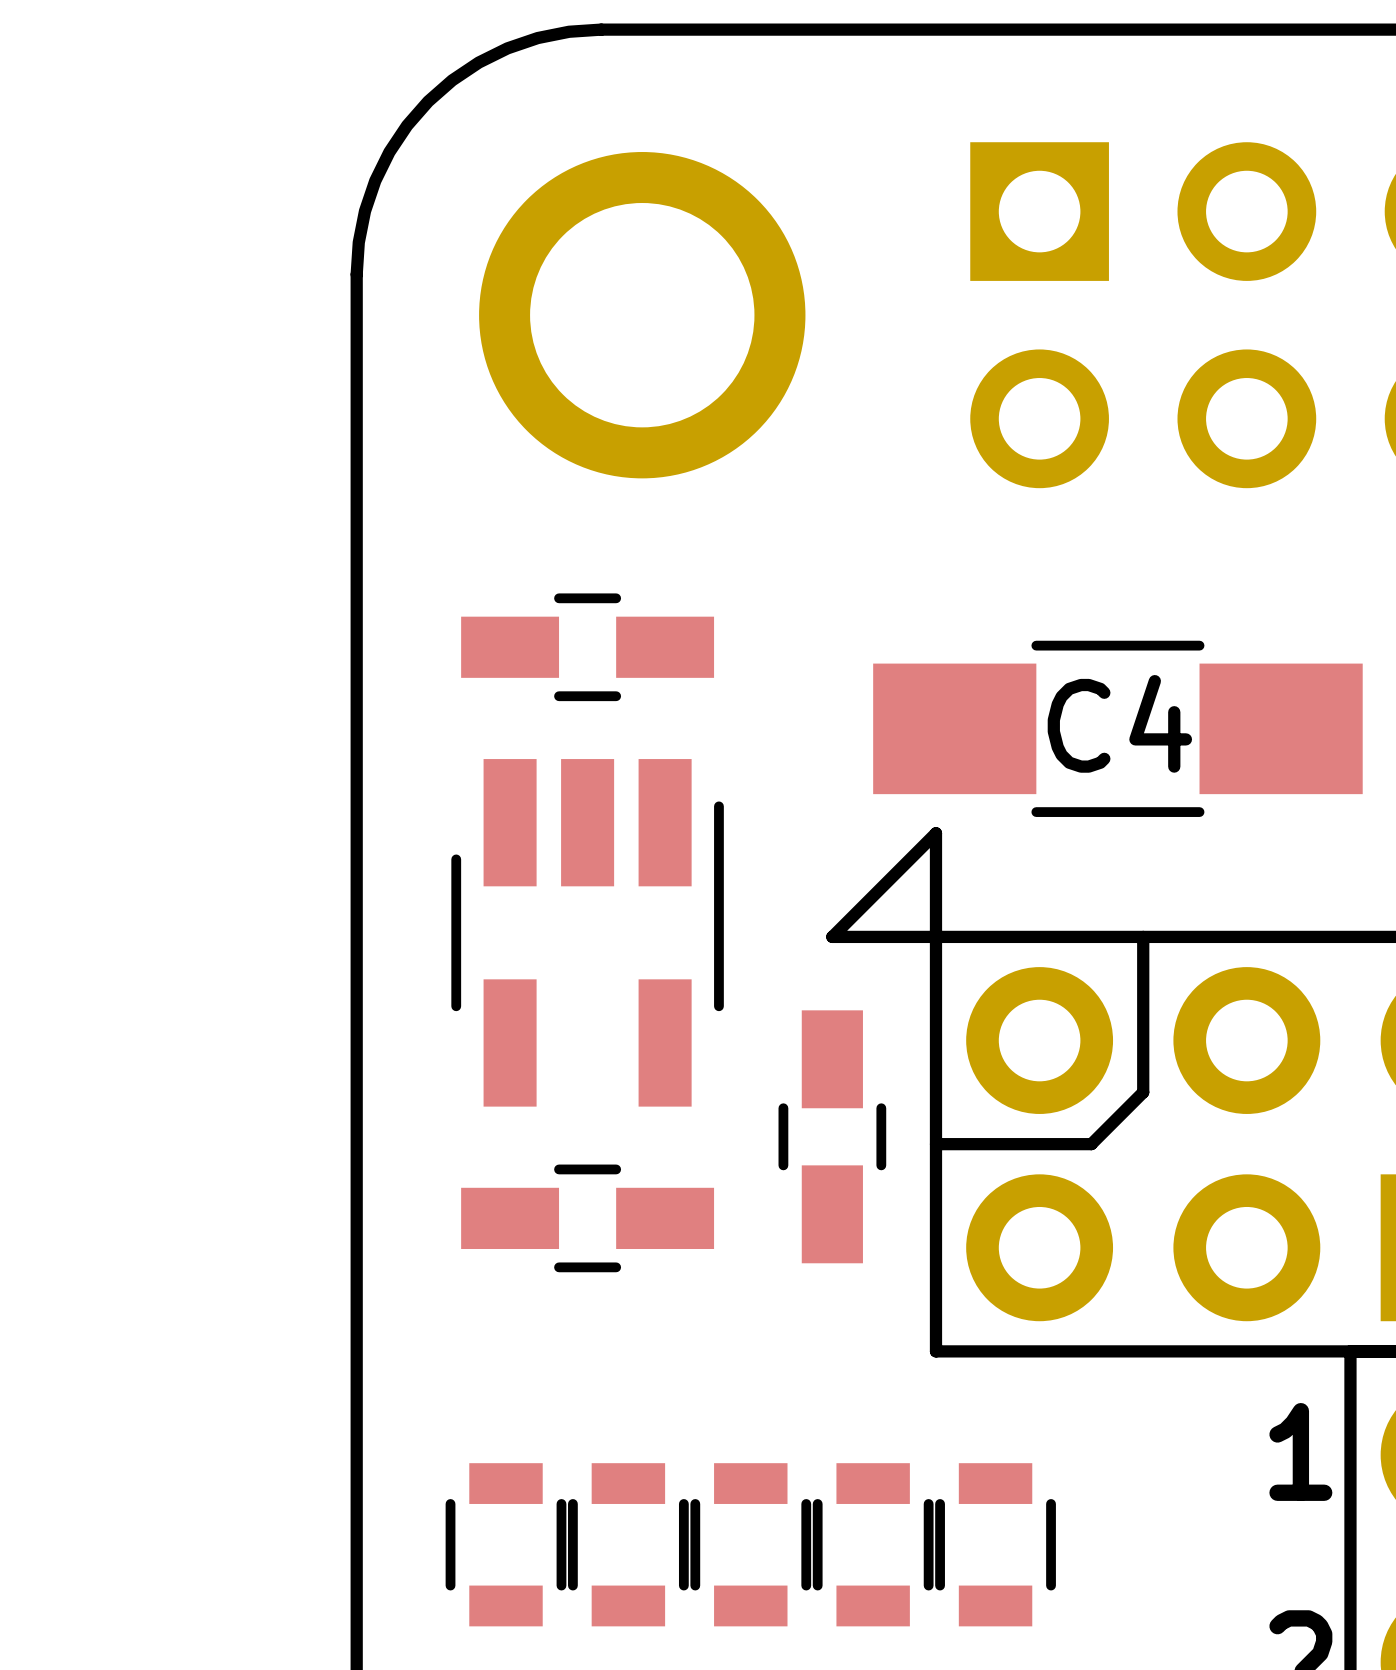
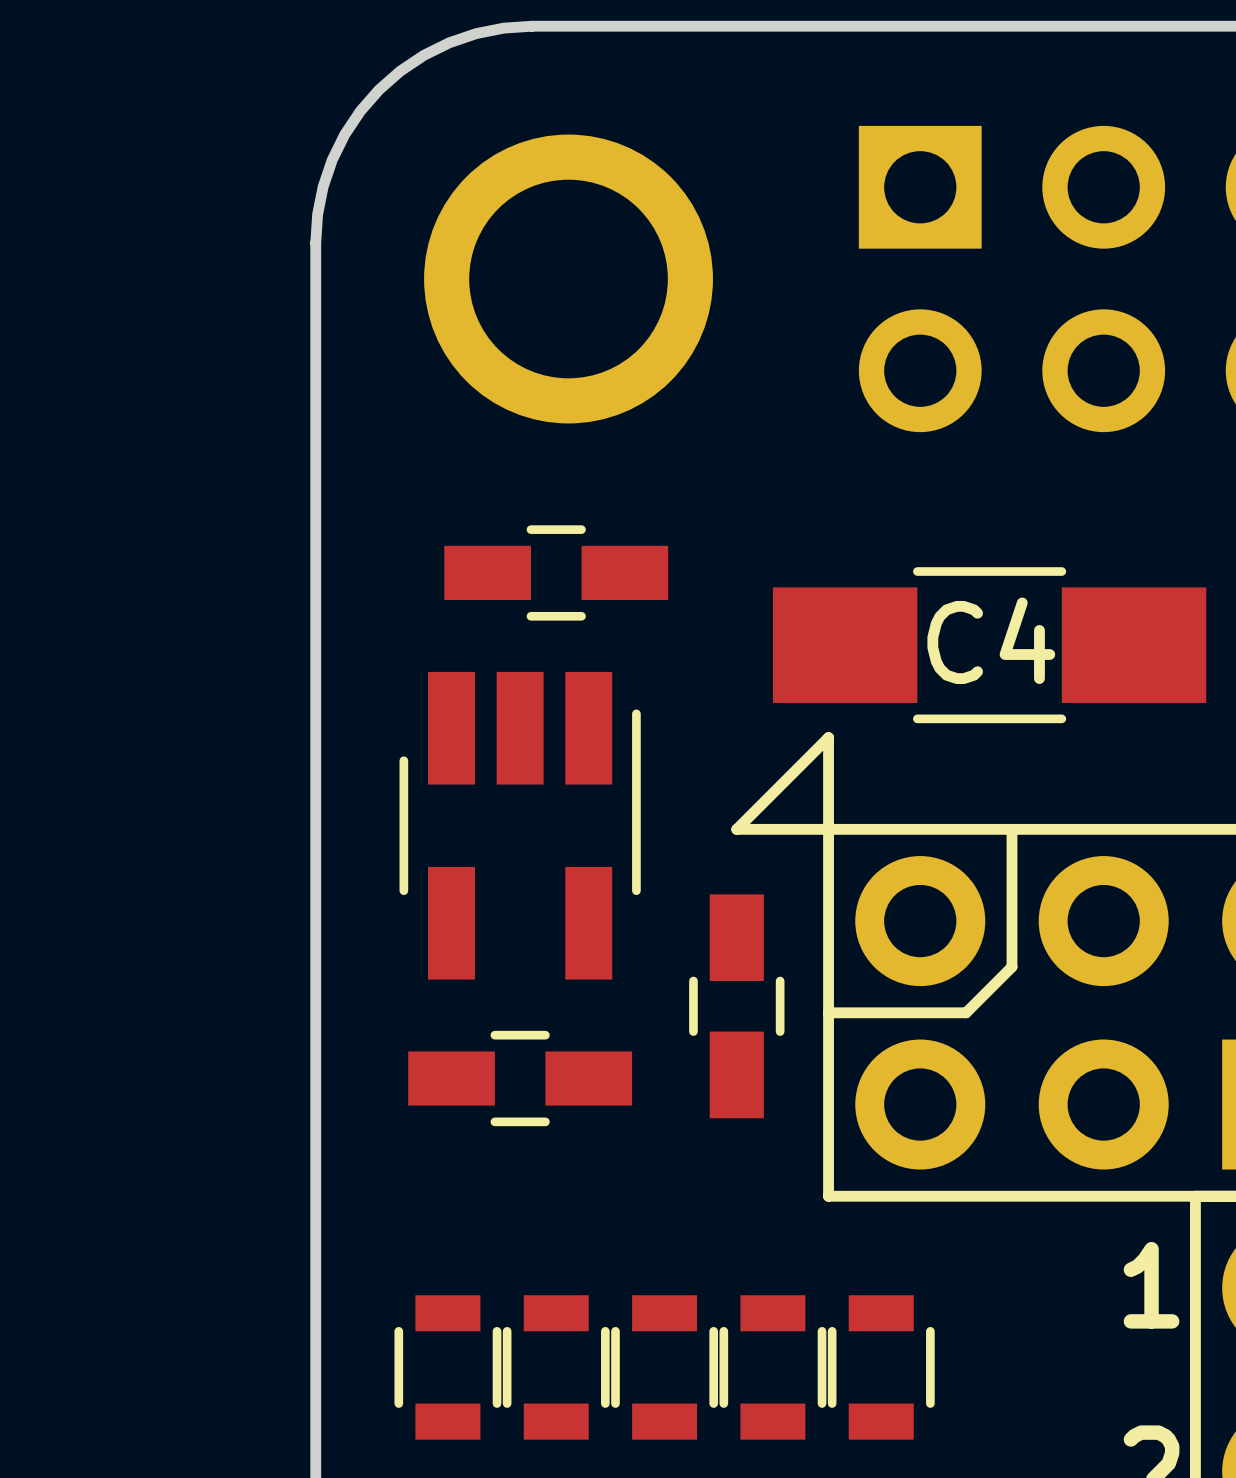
part position: (587, 647) -> (556, 572)

